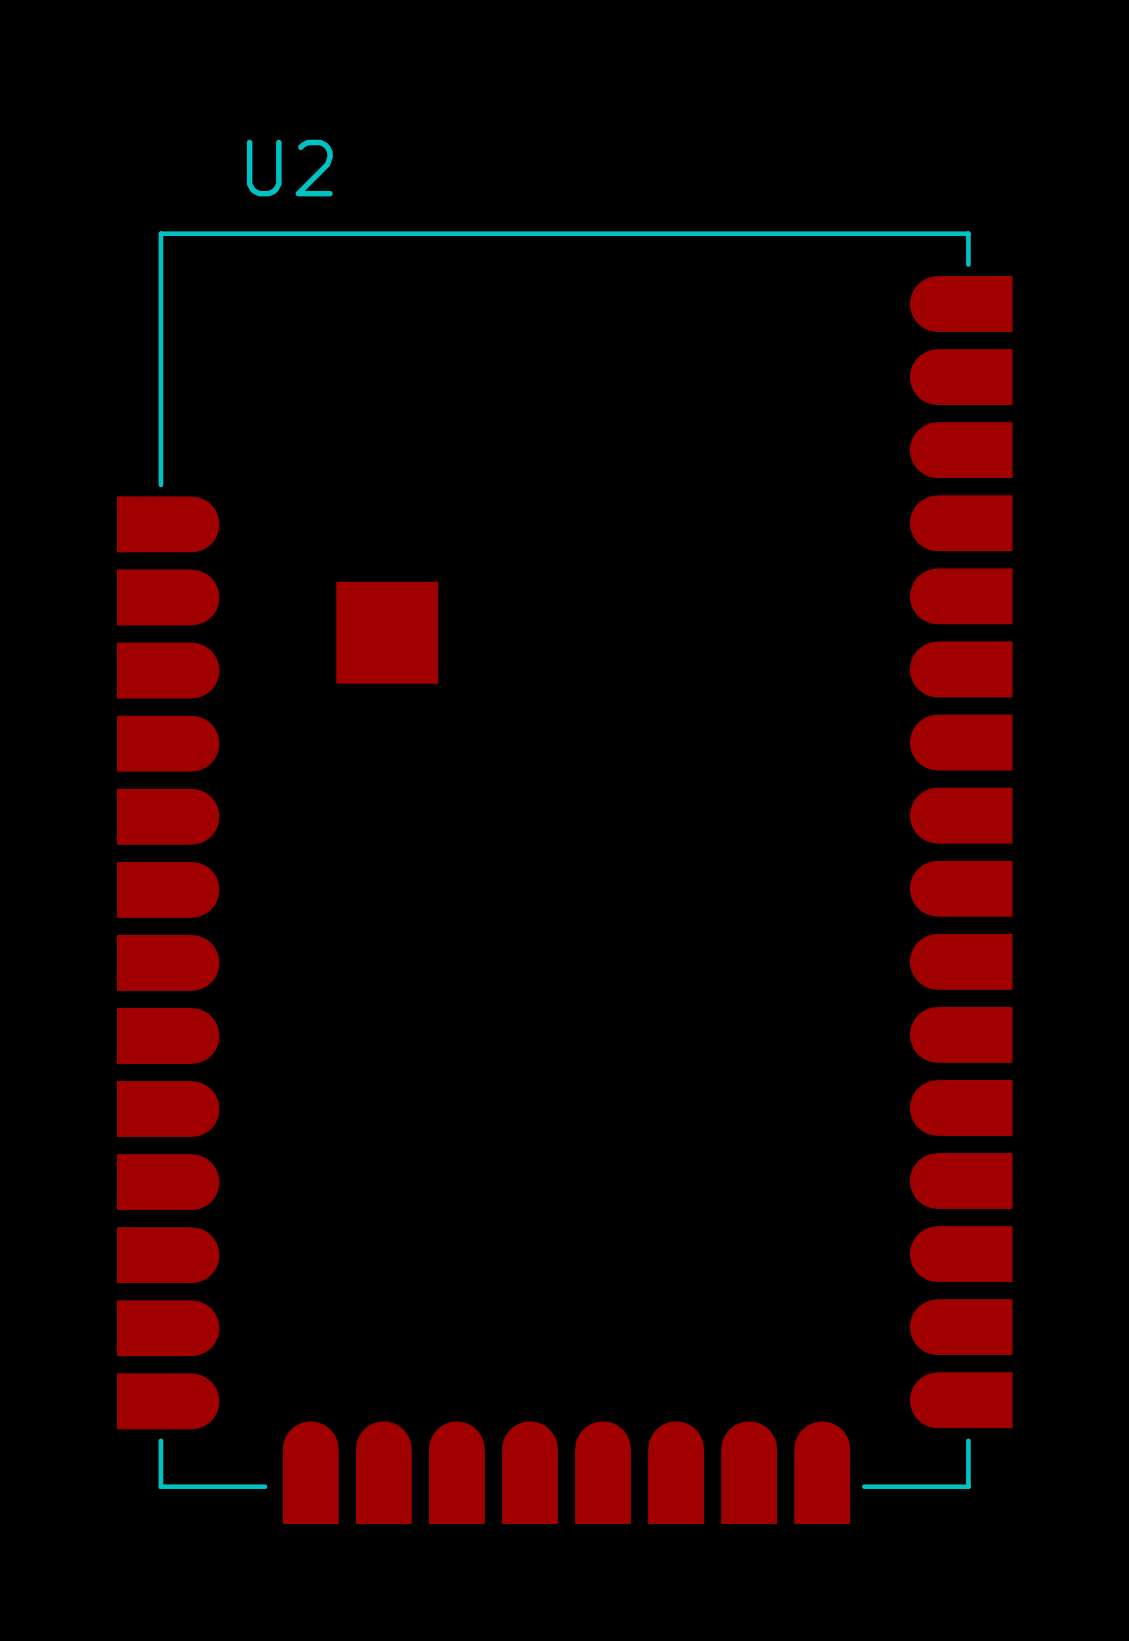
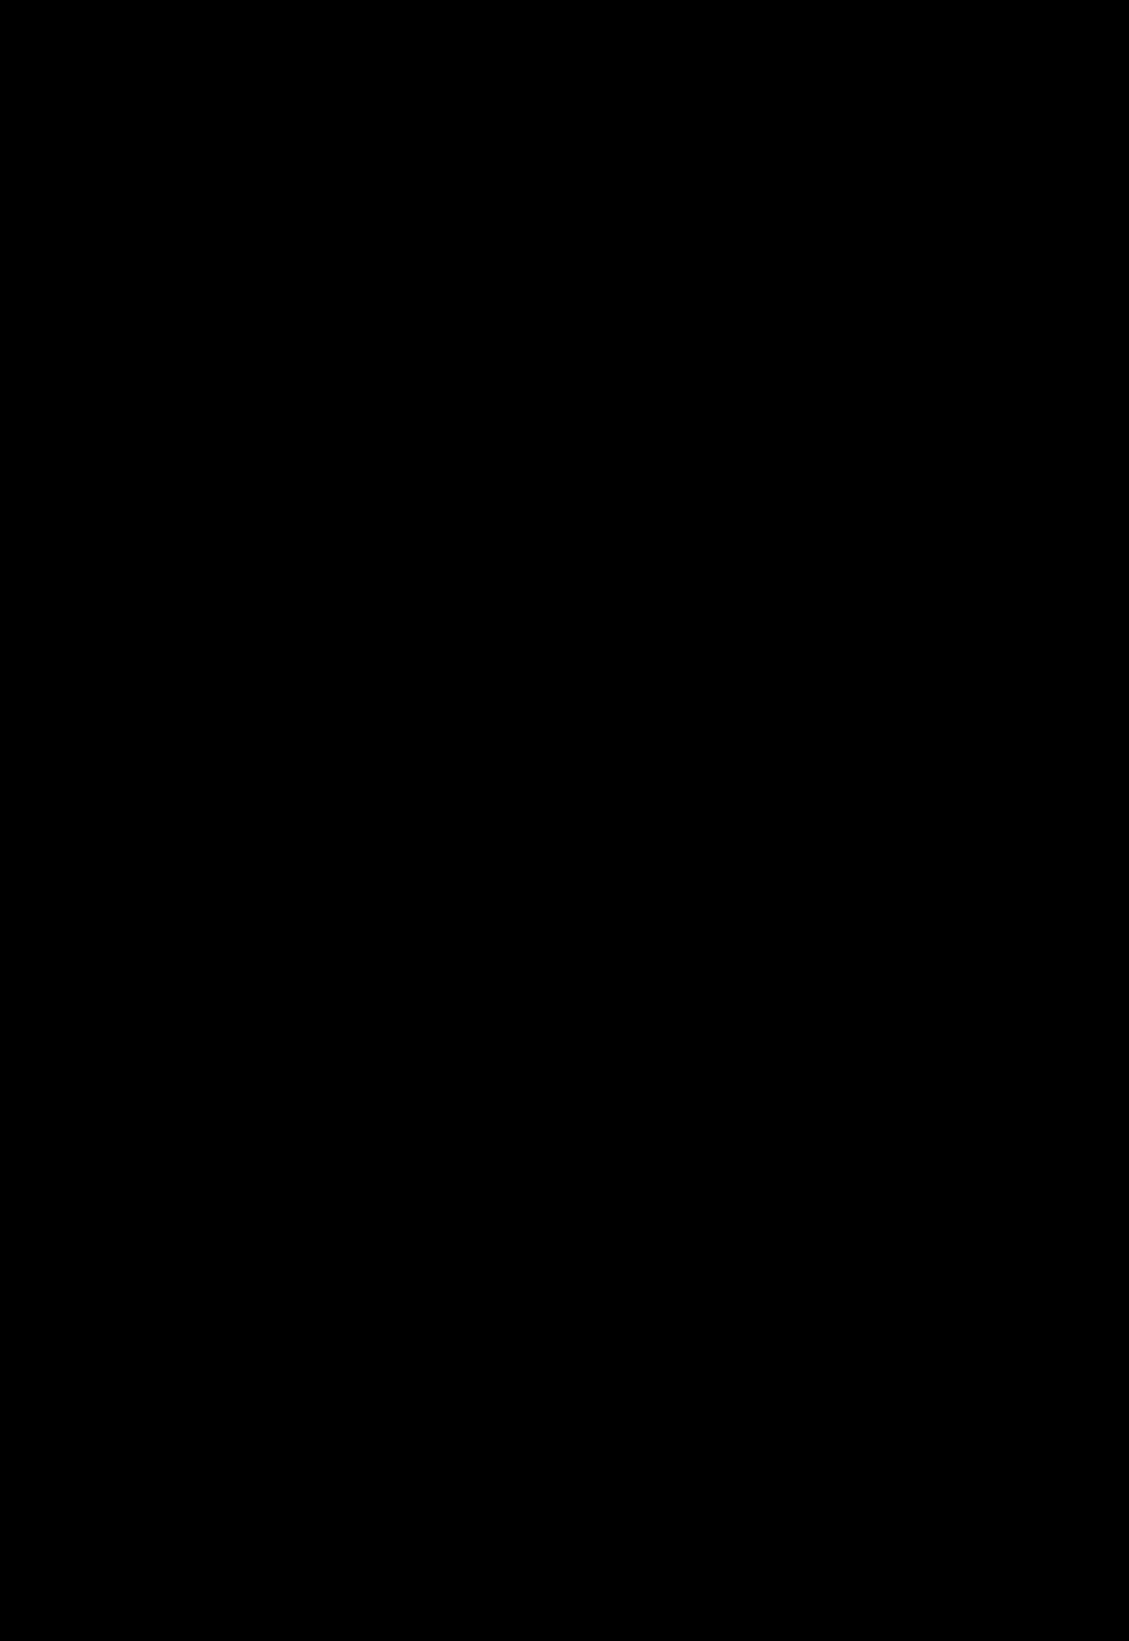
U2: (564, 877) -> none

